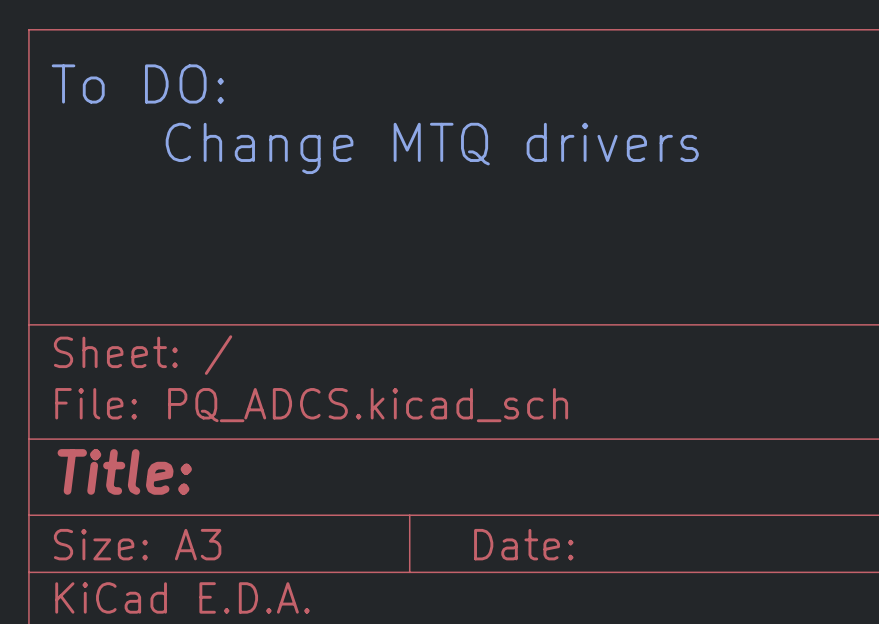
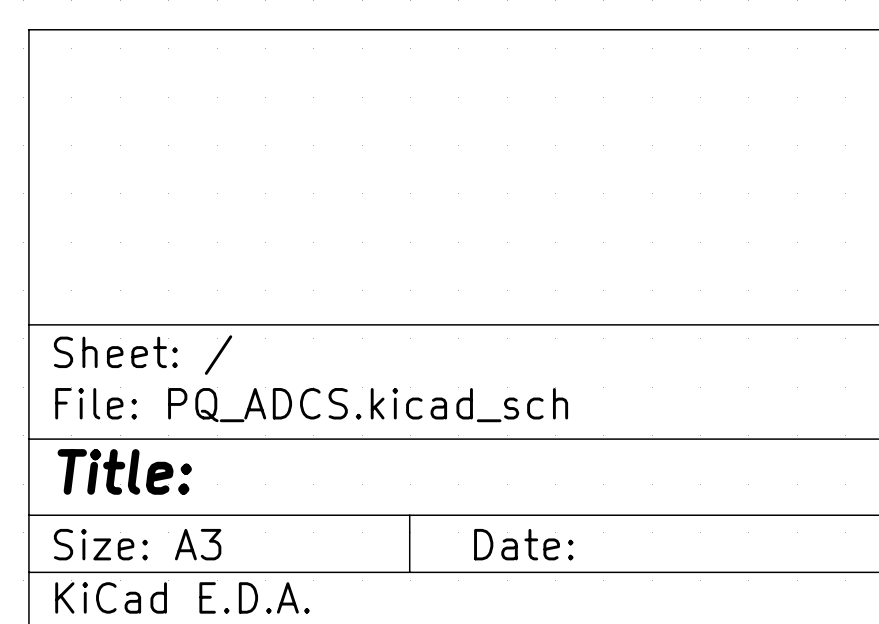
text: To DO: (137, 83) -> none
text: Change MTQ drivers (432, 148) -> none

